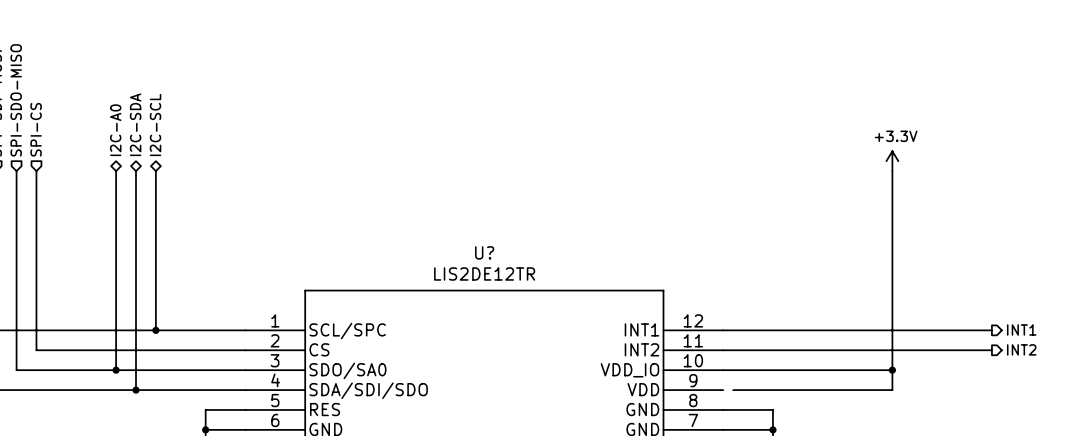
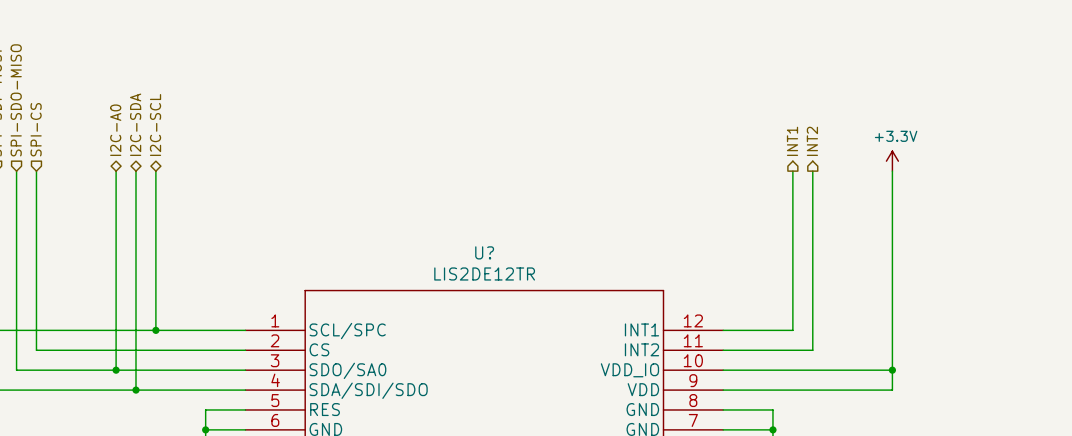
hierarchical label: none -> INT1 (792, 141)
hierarchical label: none -> INT2 (812, 141)
hierarchical label: INT1 (1021, 329) -> none
wire: (792, 330) (991, 330) -> (792, 330) (792, 171)
hierarchical label: INT2 (1021, 349) -> none
wire: (812, 350) (991, 350) -> (812, 350) (812, 171)
wire: none -> (723, 390) (733, 390)

